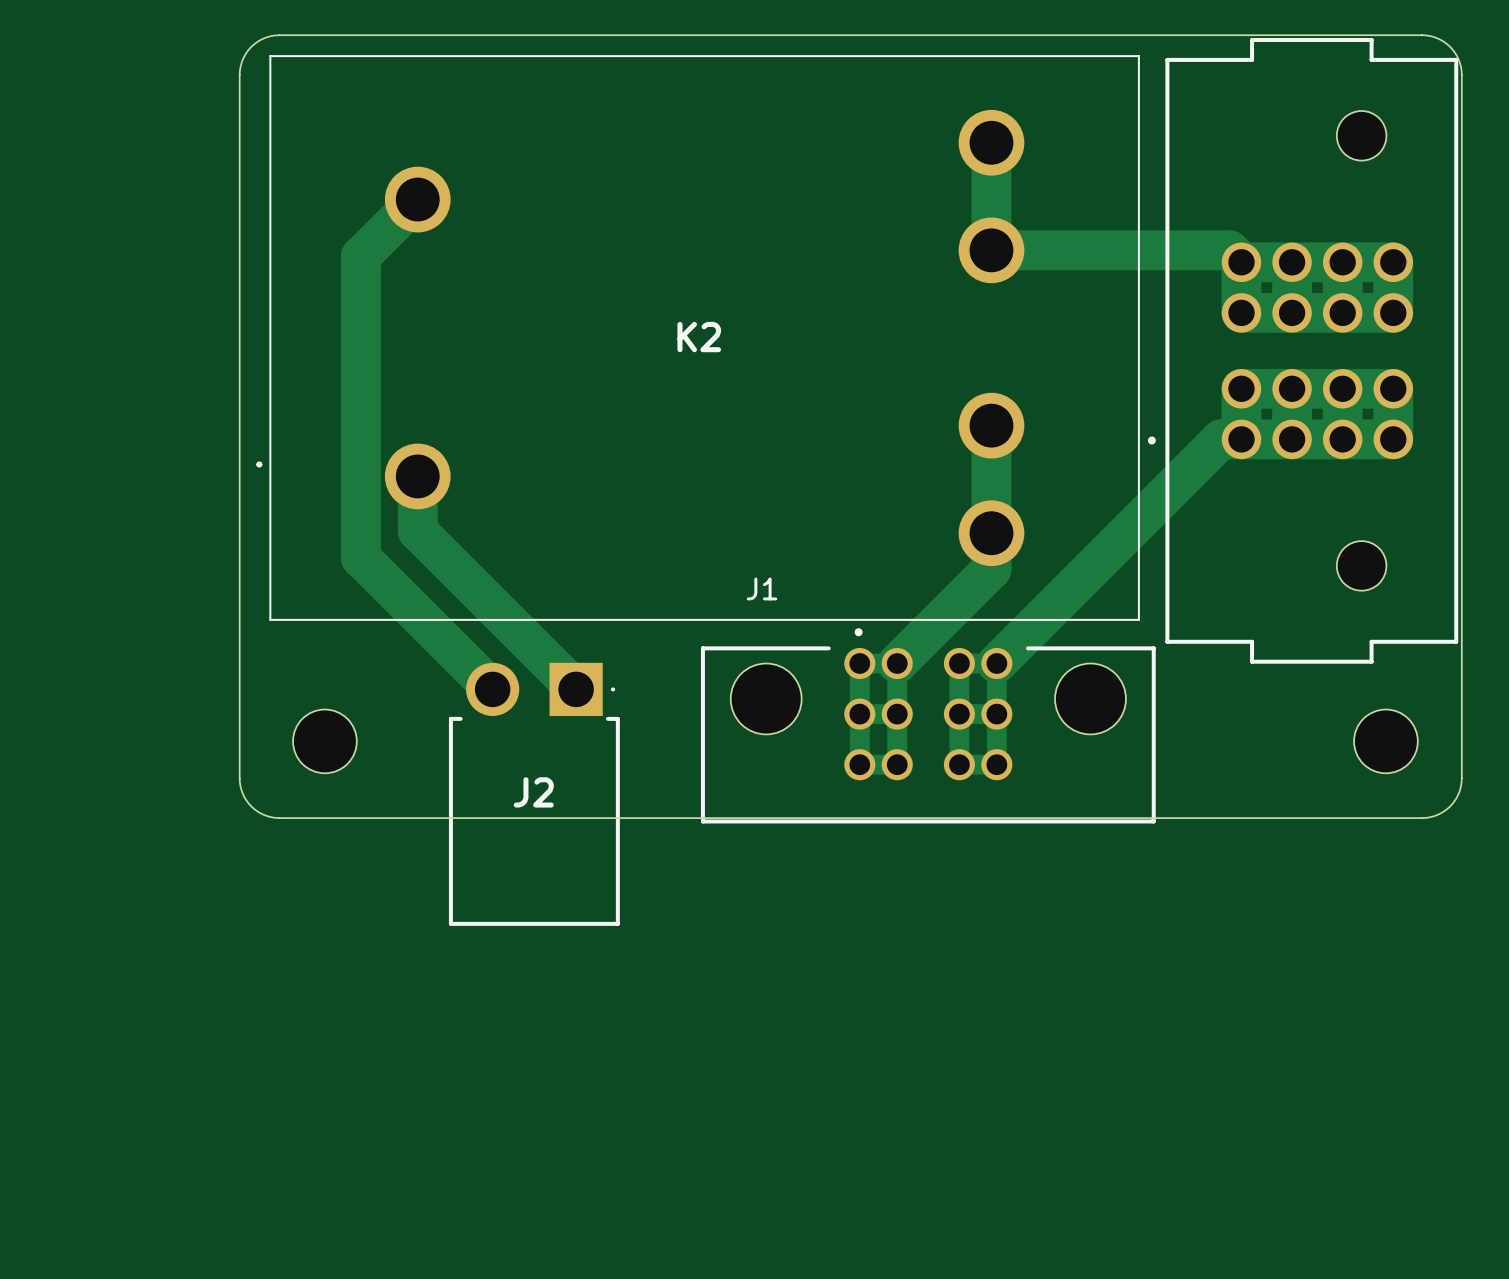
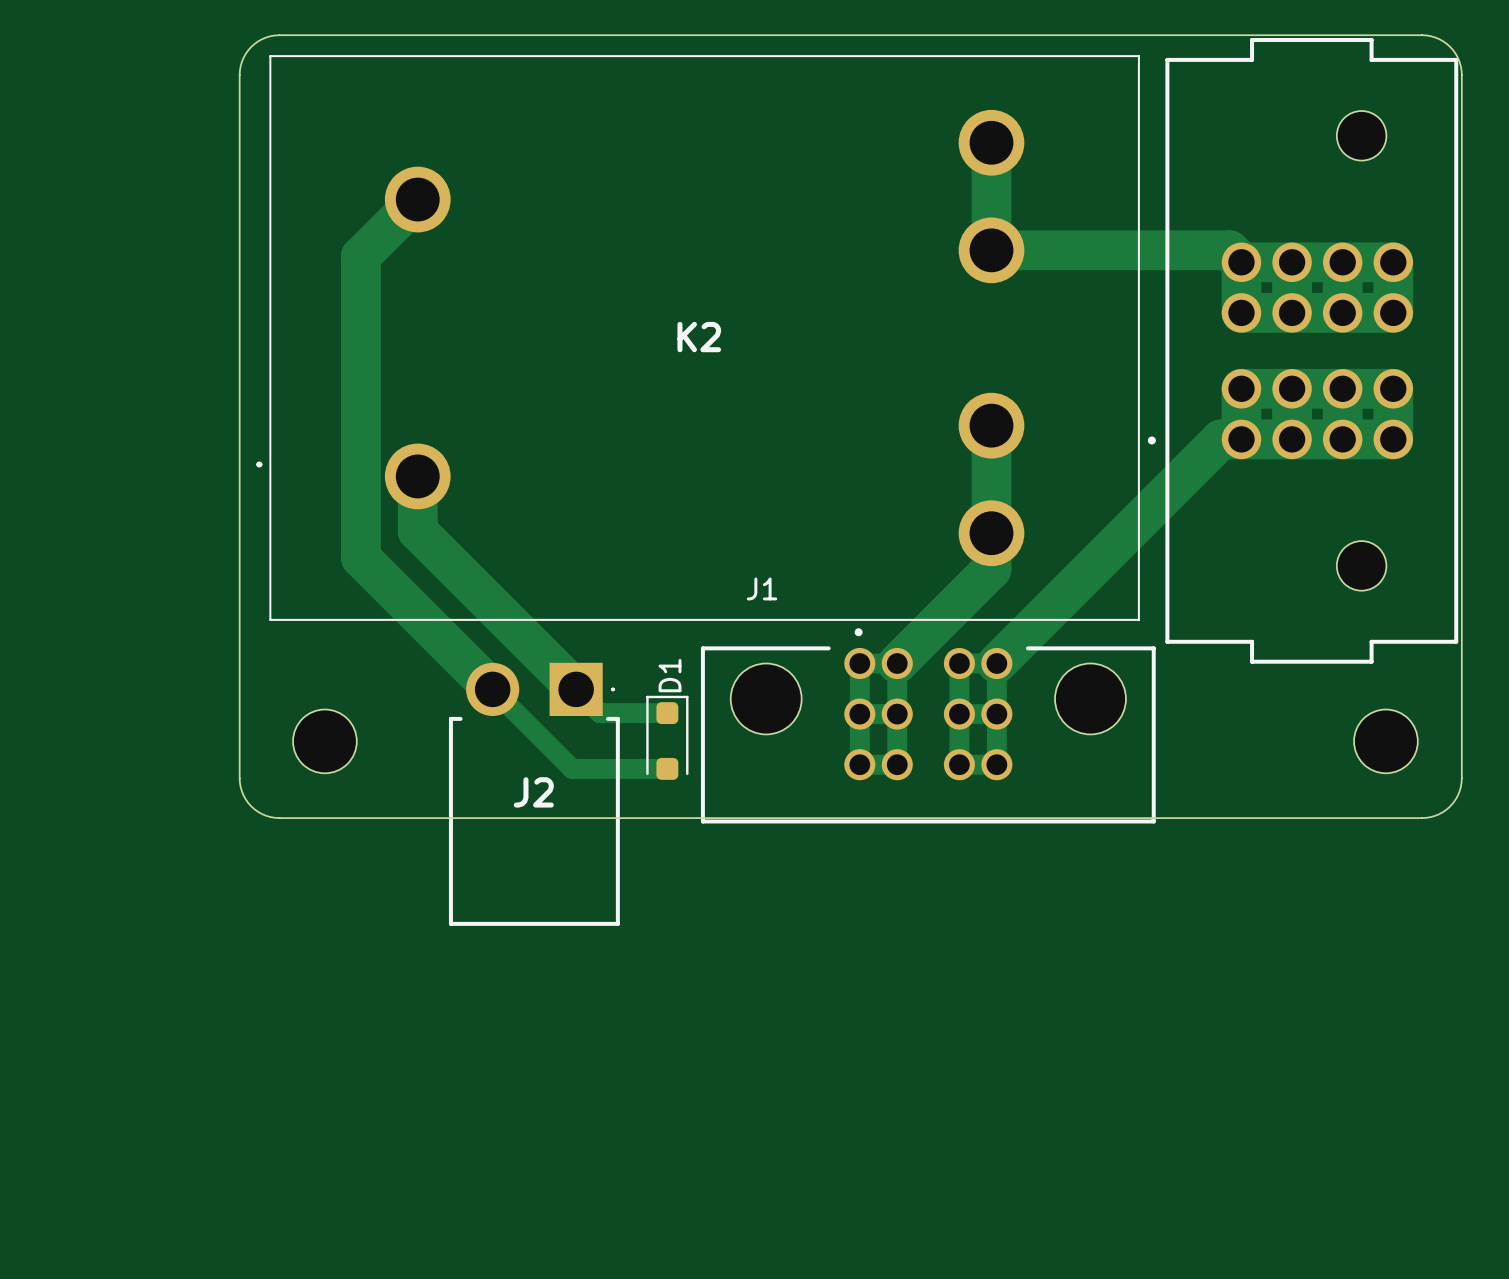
track: none -> (492, 689) (572, 768) (667, 768)
track: none -> (576, 689) (599, 713) (667, 713)
D1: none -> (667, 737)

